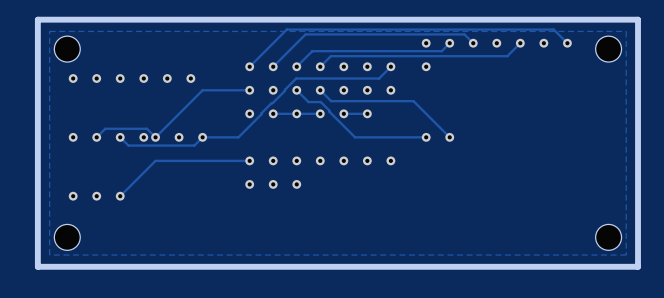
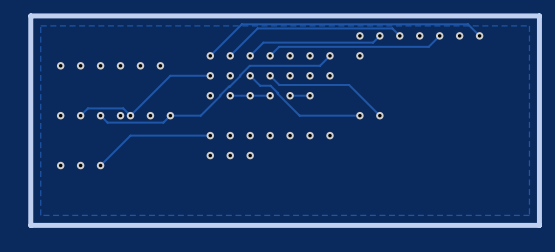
part: (67, 49) -> none
part: (608, 49) -> none
part: (67, 237) -> none
part: (608, 237) -> none

